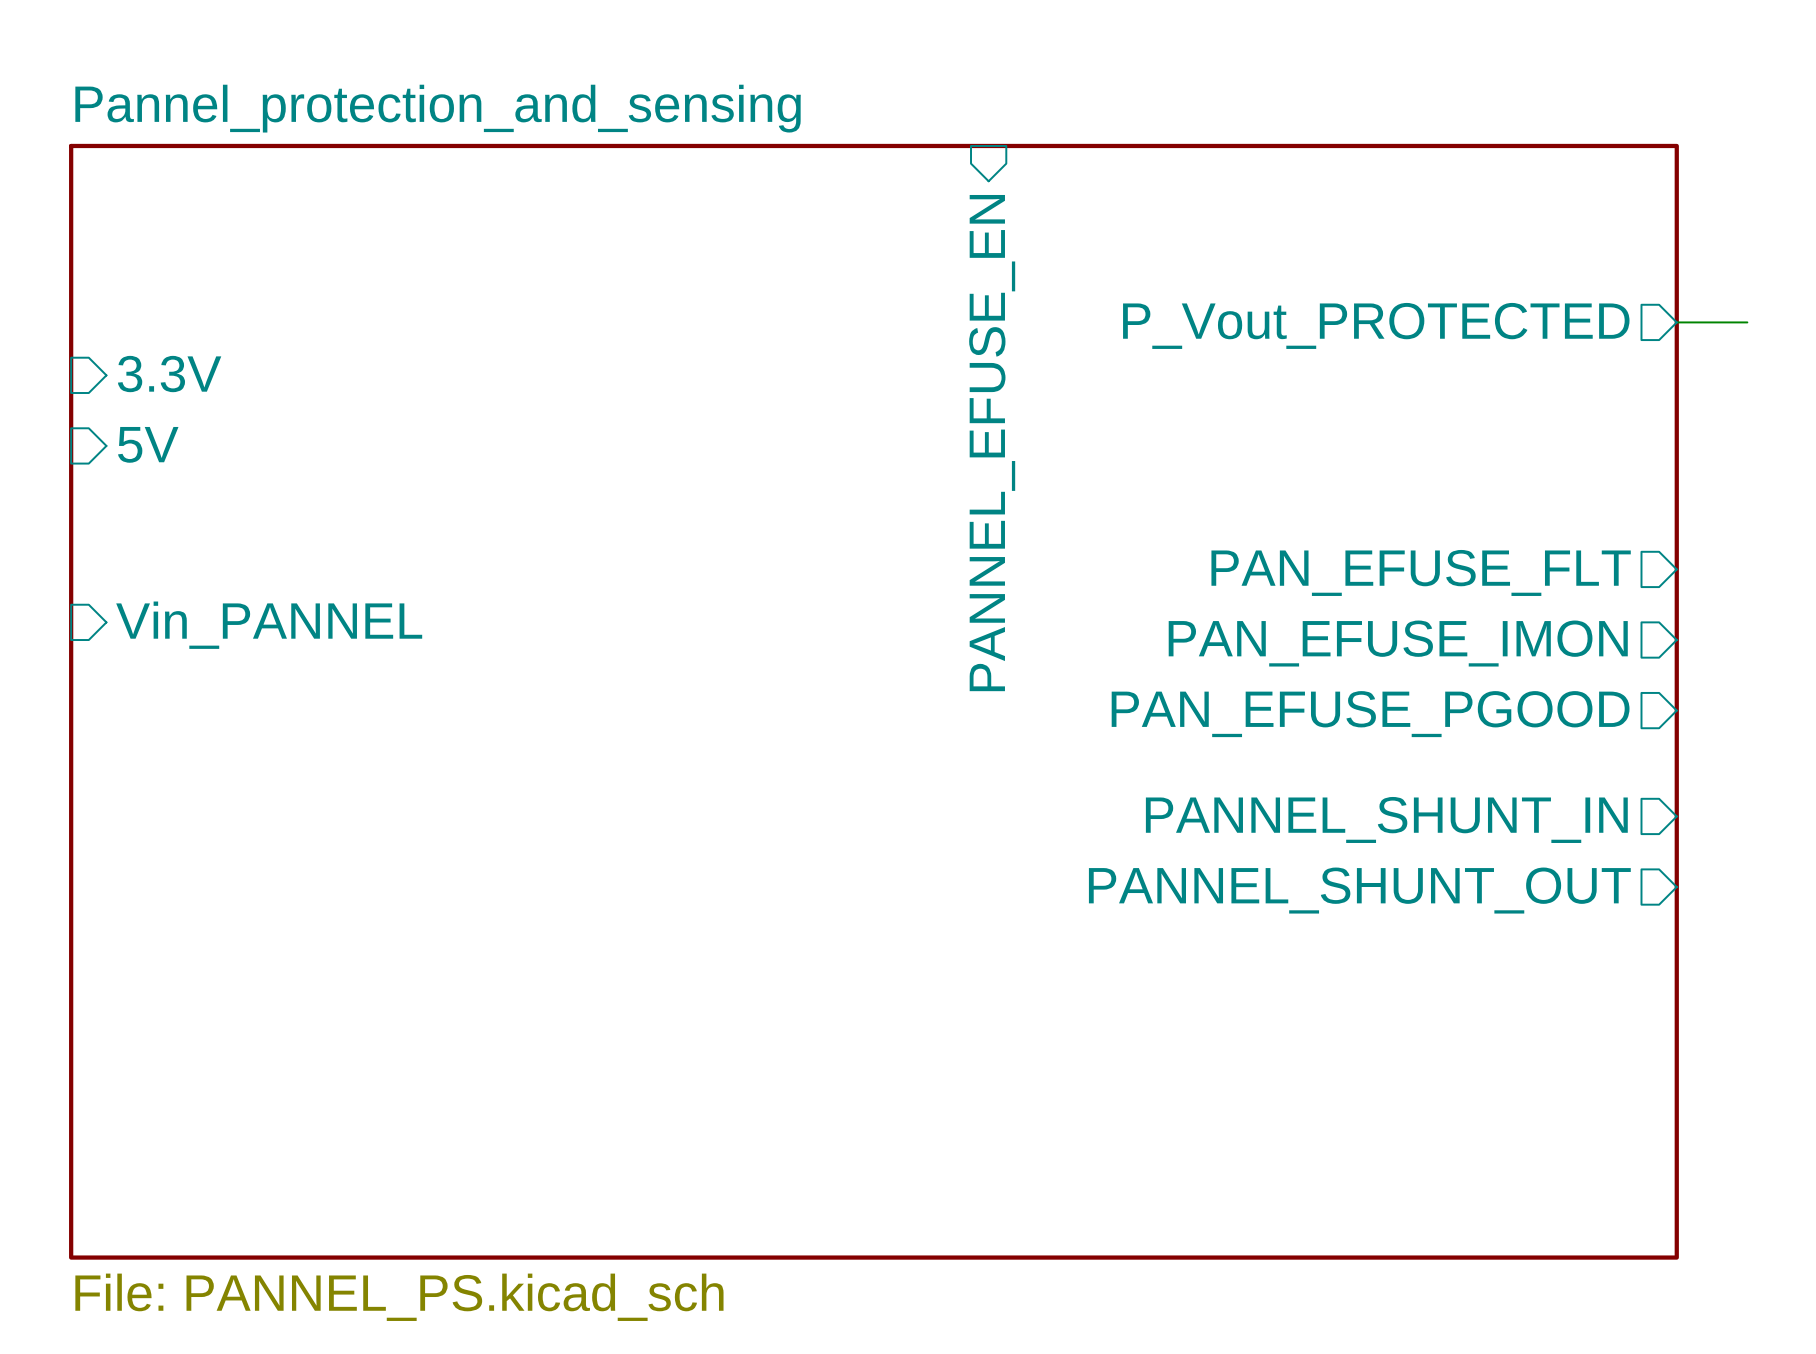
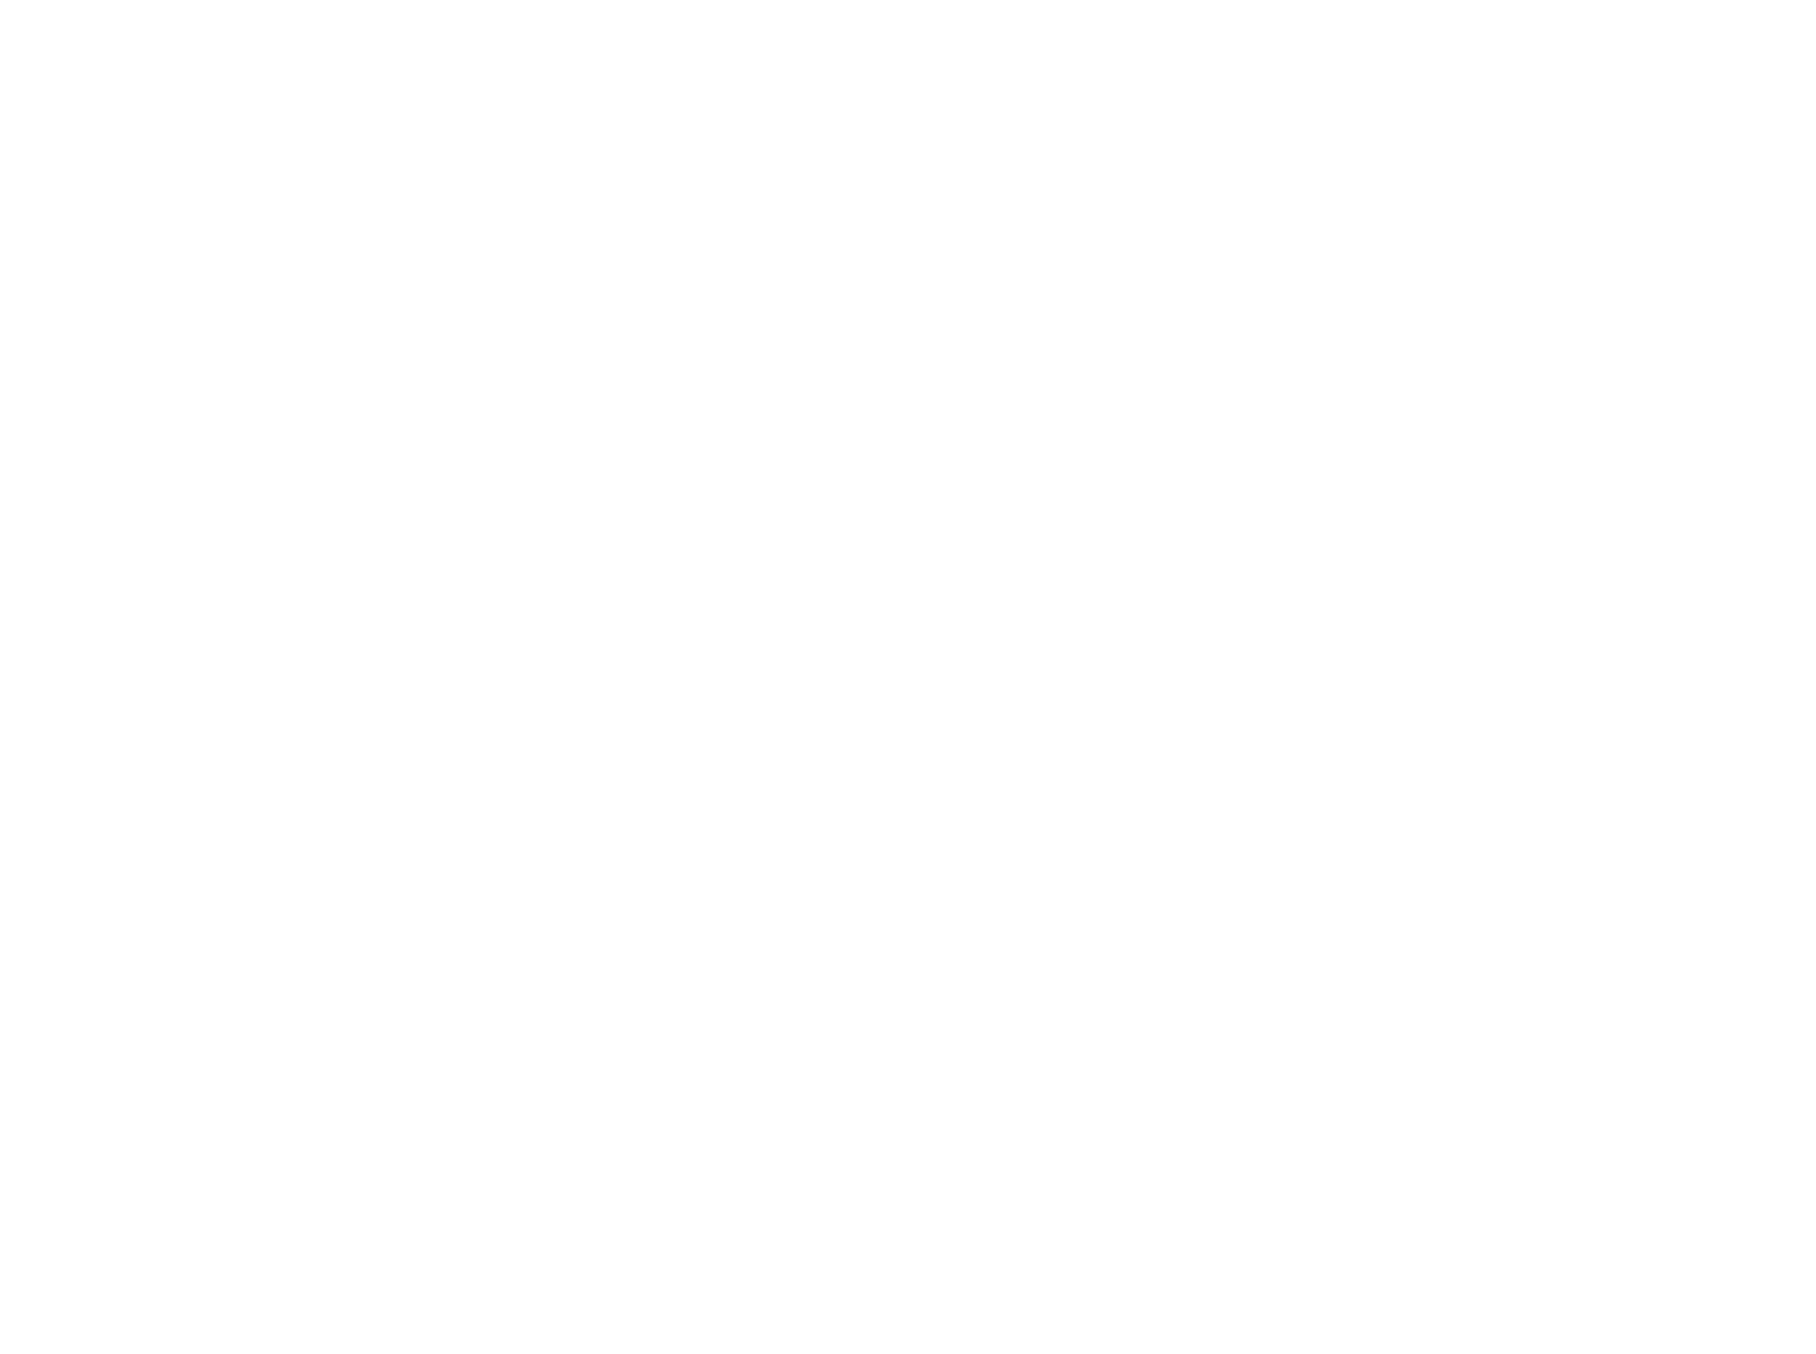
wire: (1676, 322) (1747, 322) -> none
sheet pin: P_Vout_PROTECTED (1376, 325) -> none
sheet pin: 3.3V (169, 374) -> none
sheet pin: PANNEL_EFUSE_EN (992, 443) -> none
sheet pin: 5V (148, 444) -> none
sheet pin: PAN_EFUSE_FLT (1421, 572) -> none
sheet pin: Vin_PANNEL (269, 625) -> none
sheet pin: PAN_EFUSE_IMON (1398, 643) -> none
sheet Pannel_protection_and_sensing: File: PANNEL_PS.kicad_sch (873, 701) -> none
sheet pin: PAN_EFUSE_PGOOD (1370, 714) -> none
sheet pin: PANNEL_SHUNT_IN (1386, 819) -> none
sheet pin: PANNEL_SHUNT_OUT (1359, 890) -> none

